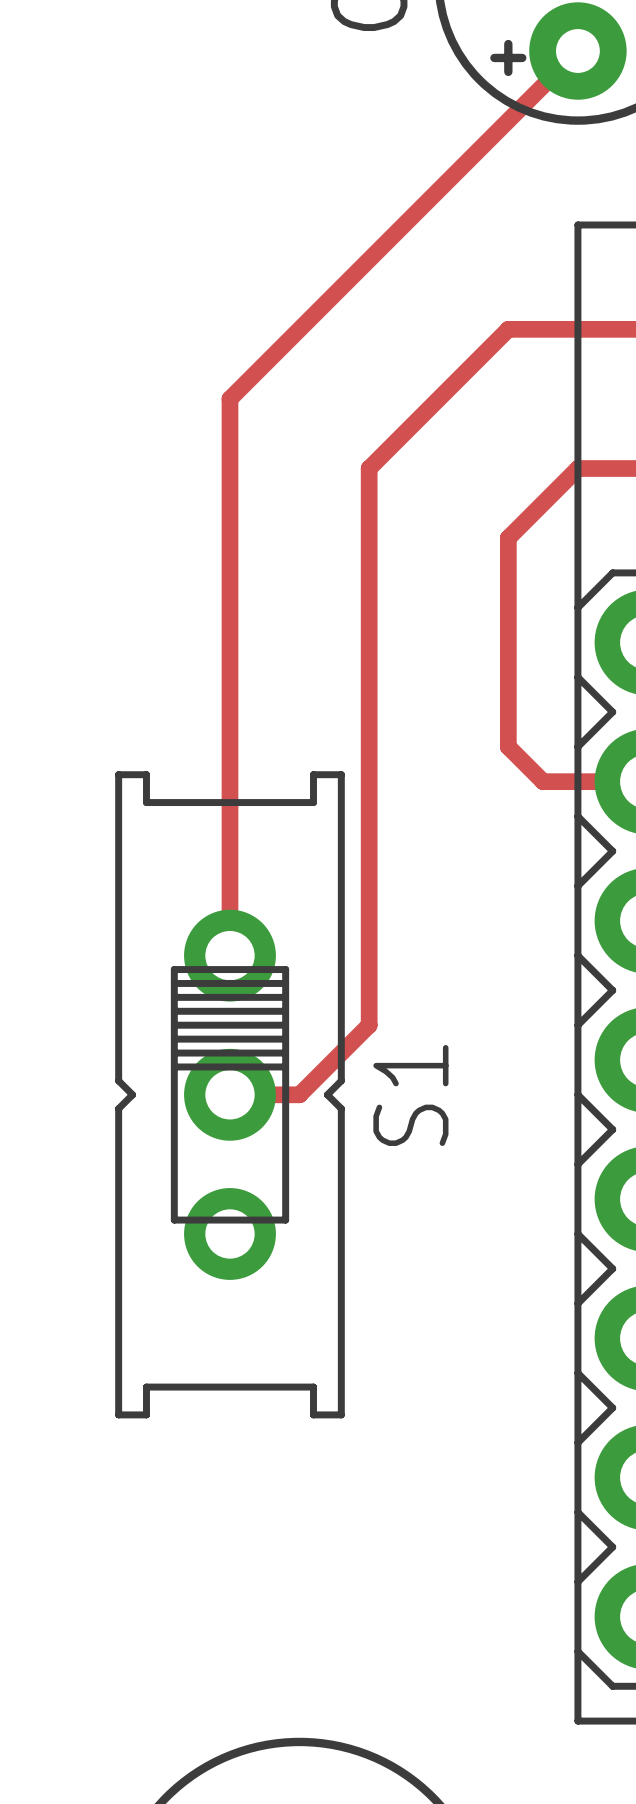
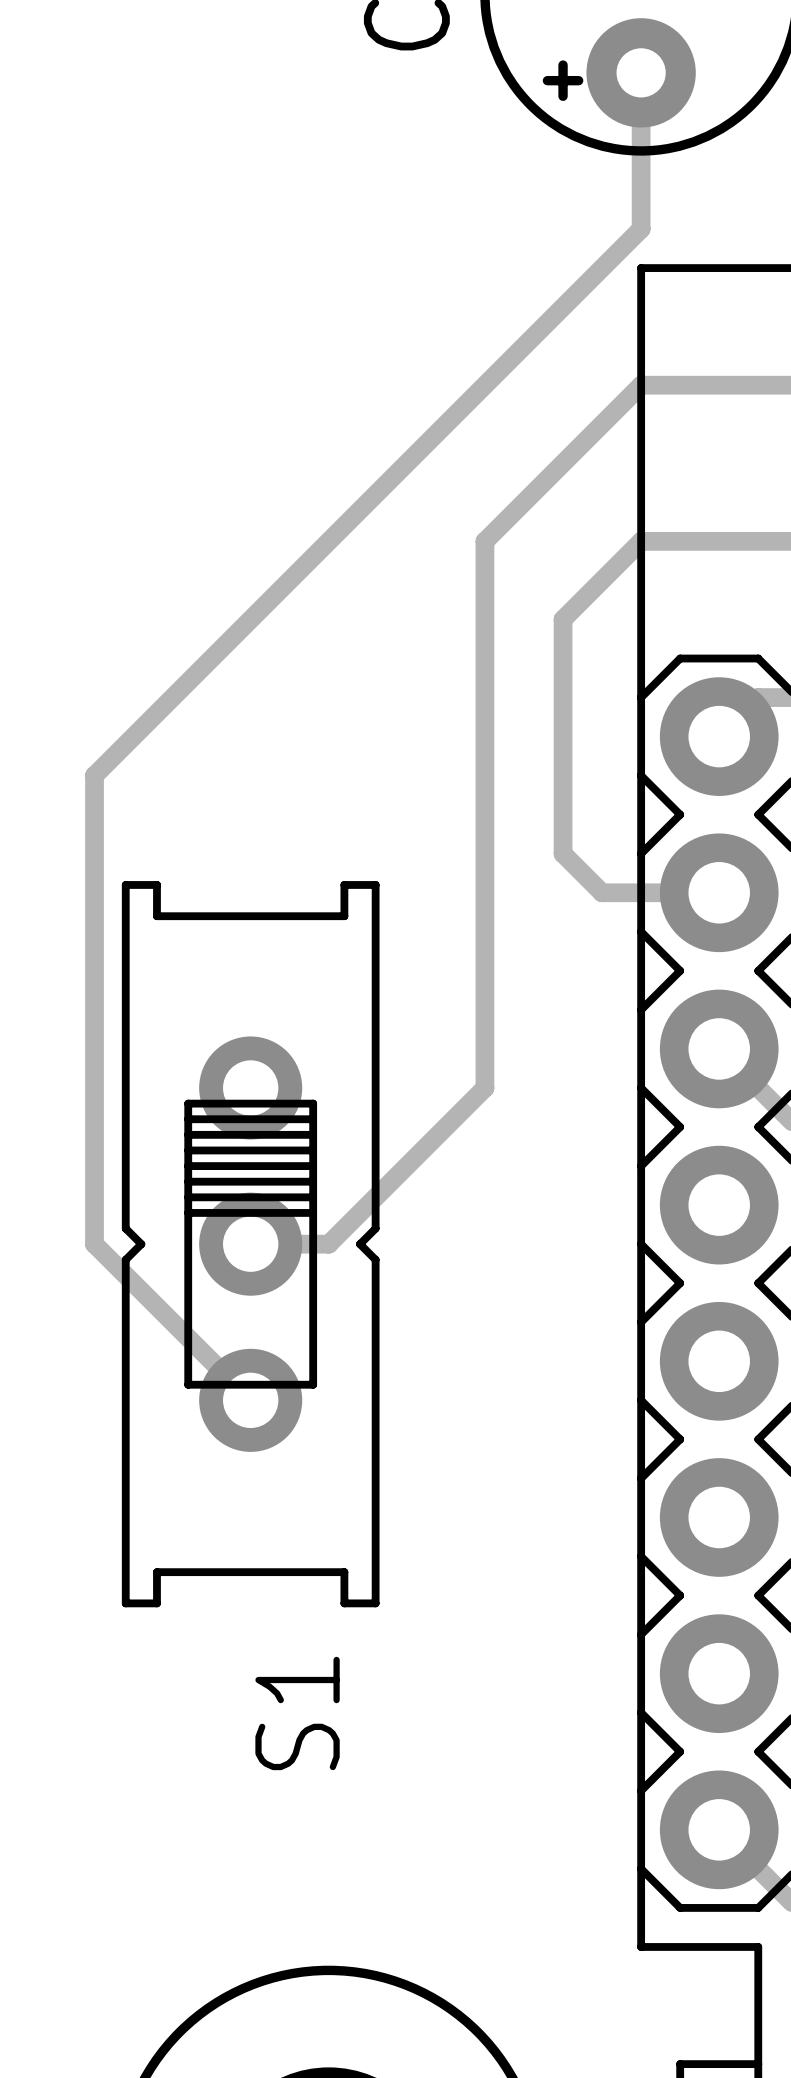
track: (577, 51) (229, 398) (229, 955) -> (641, 72) (641, 229) (94, 775) (94, 1244) (250, 1400)
track: (577, 329) (508, 329) (369, 468) (369, 1025) -> (641, 385) (484, 541) (484, 1088) (406, 1166)
S1 name position: S1 (410, 1095) -> S1 (297, 1713)

